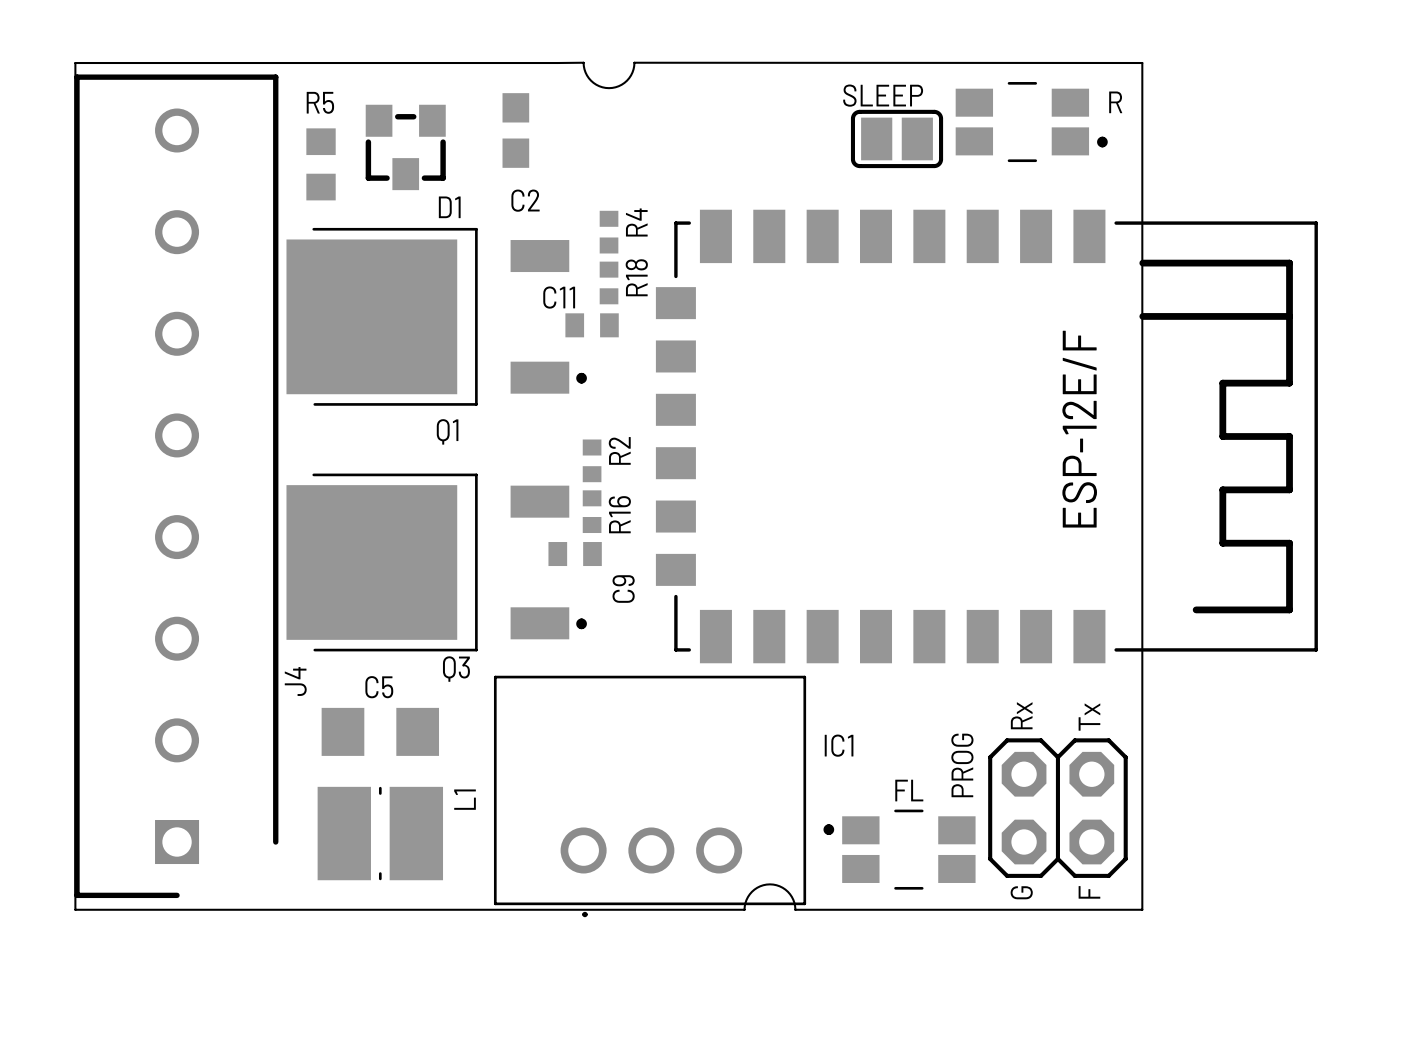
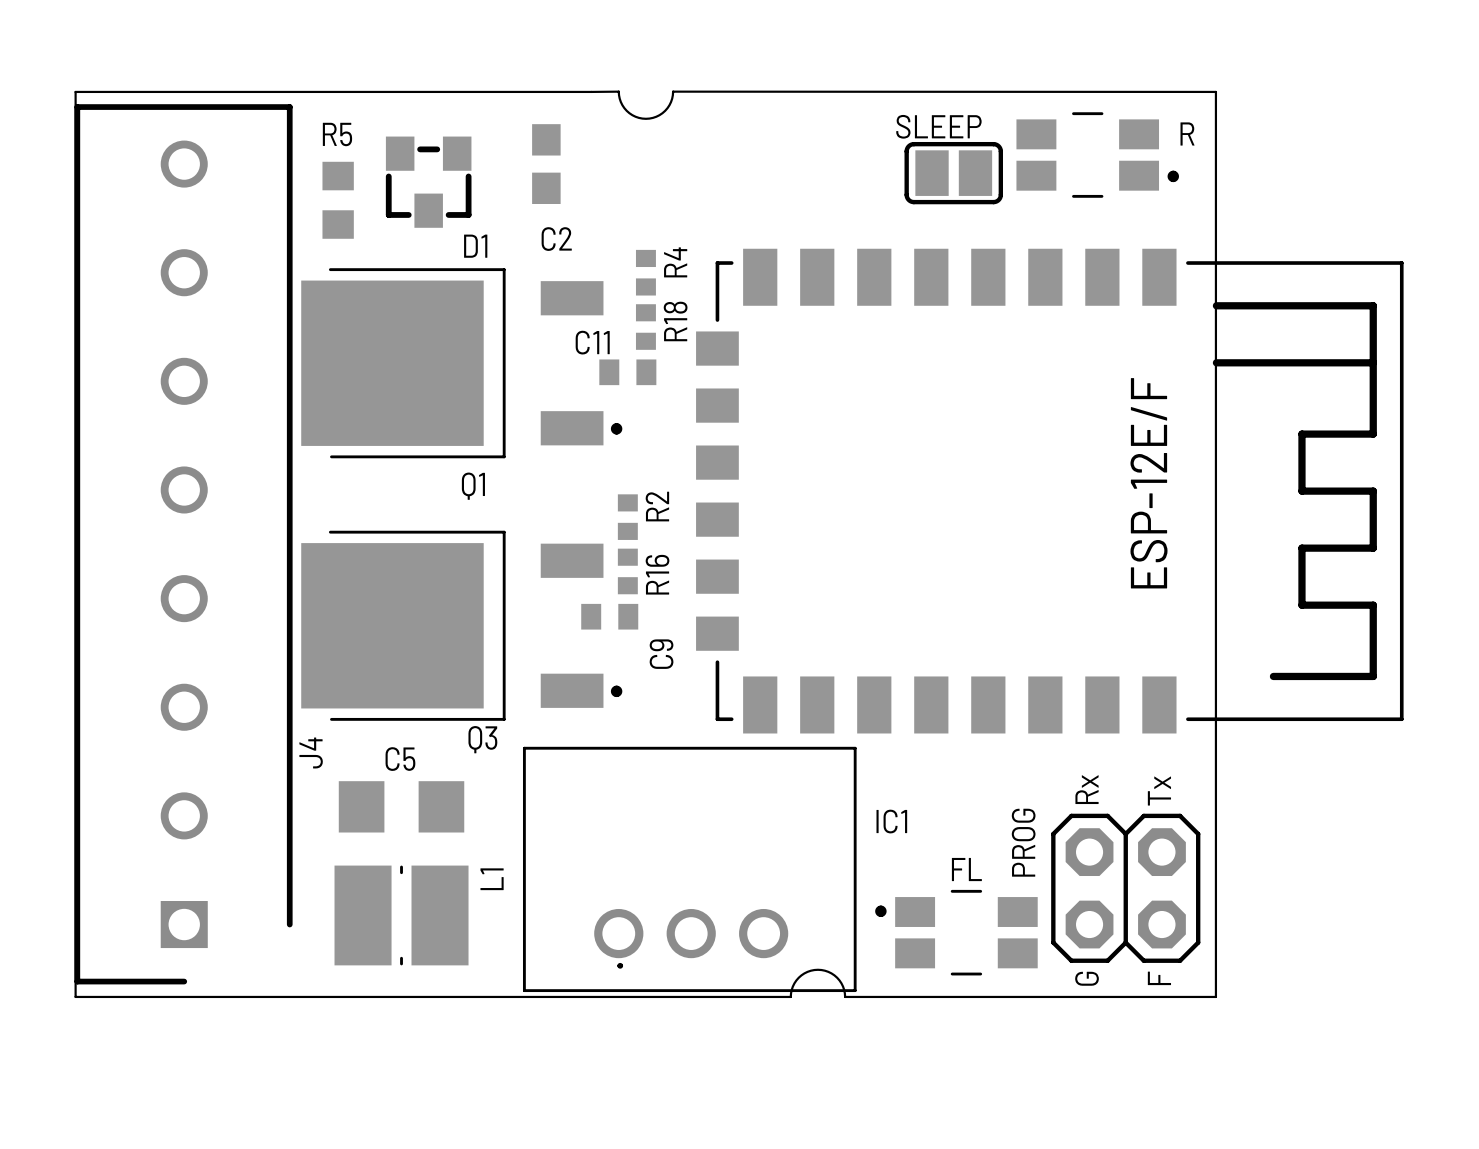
IC1 footprint: [493, 675, 807, 918] -> [522, 746, 857, 993]

